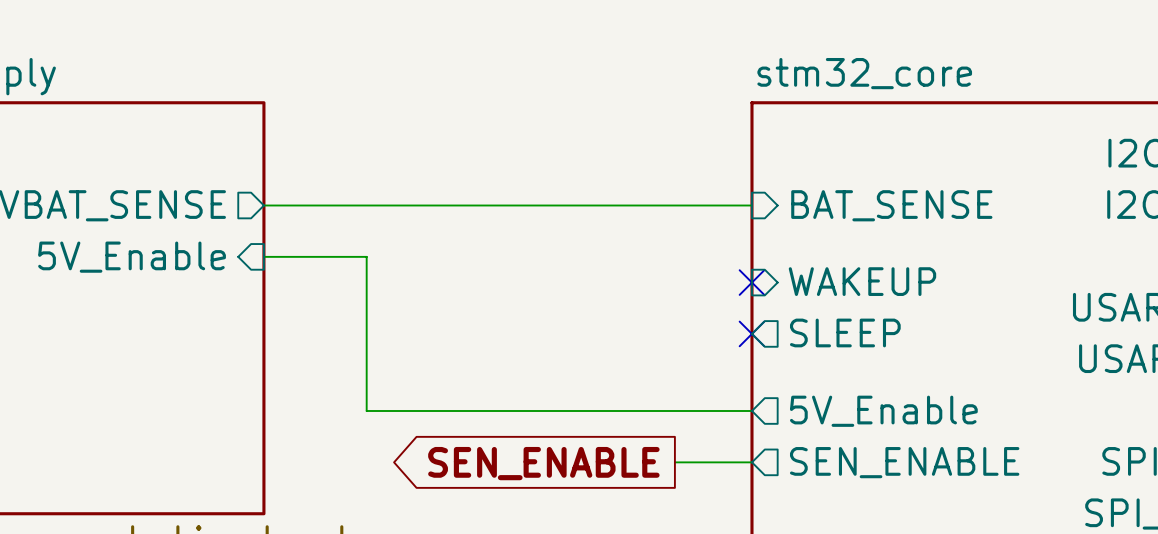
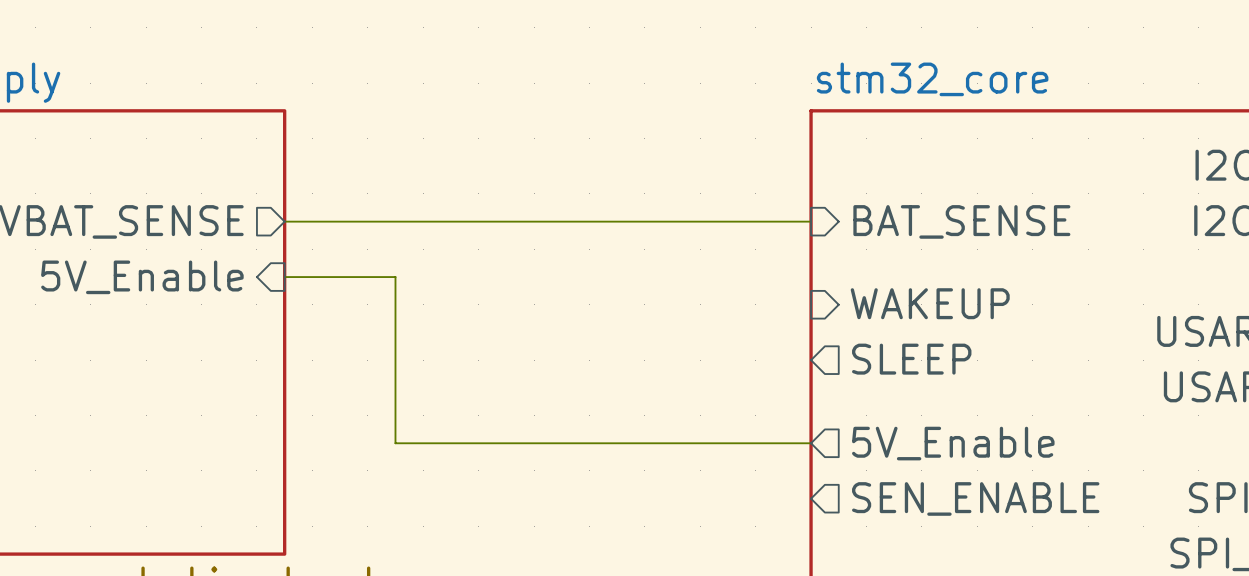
no-connect mark: (751, 282) -> none
no-connect mark: (751, 333) -> none
wire: (674, 462) (751, 462) -> none
global label: SEN_ENABLE (543, 463) -> none

